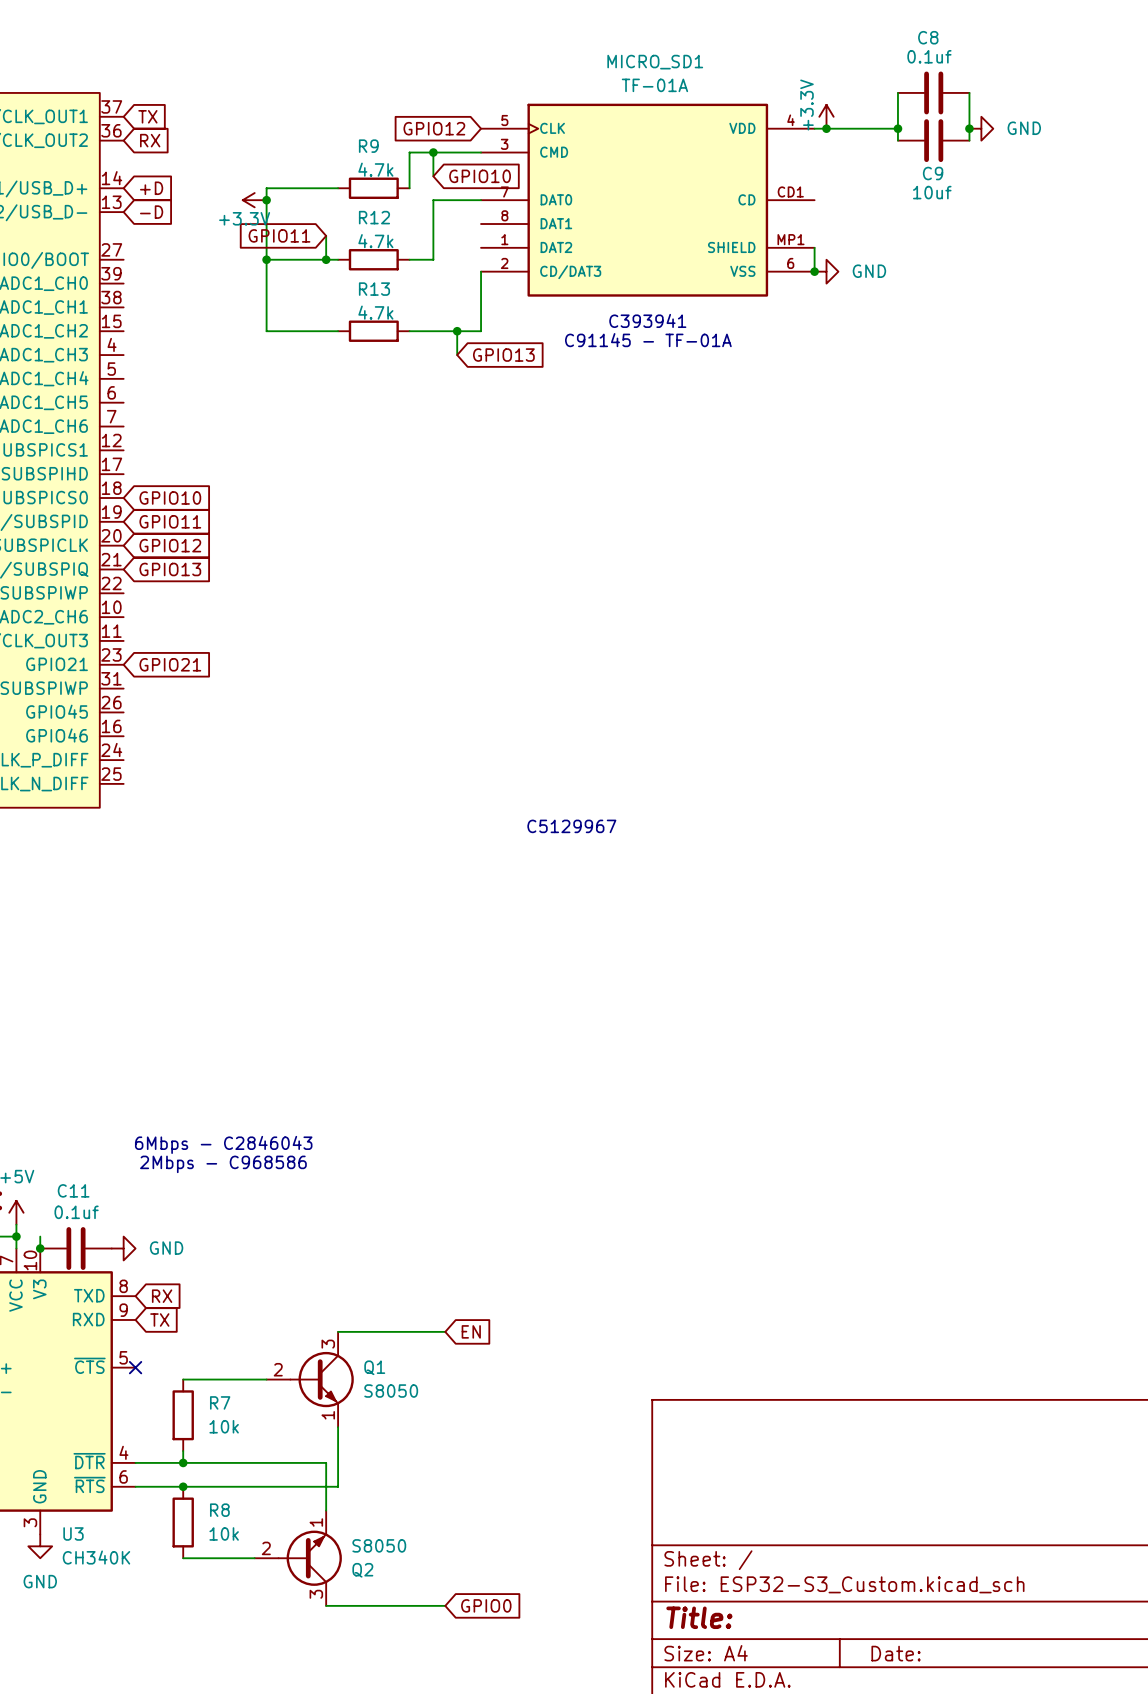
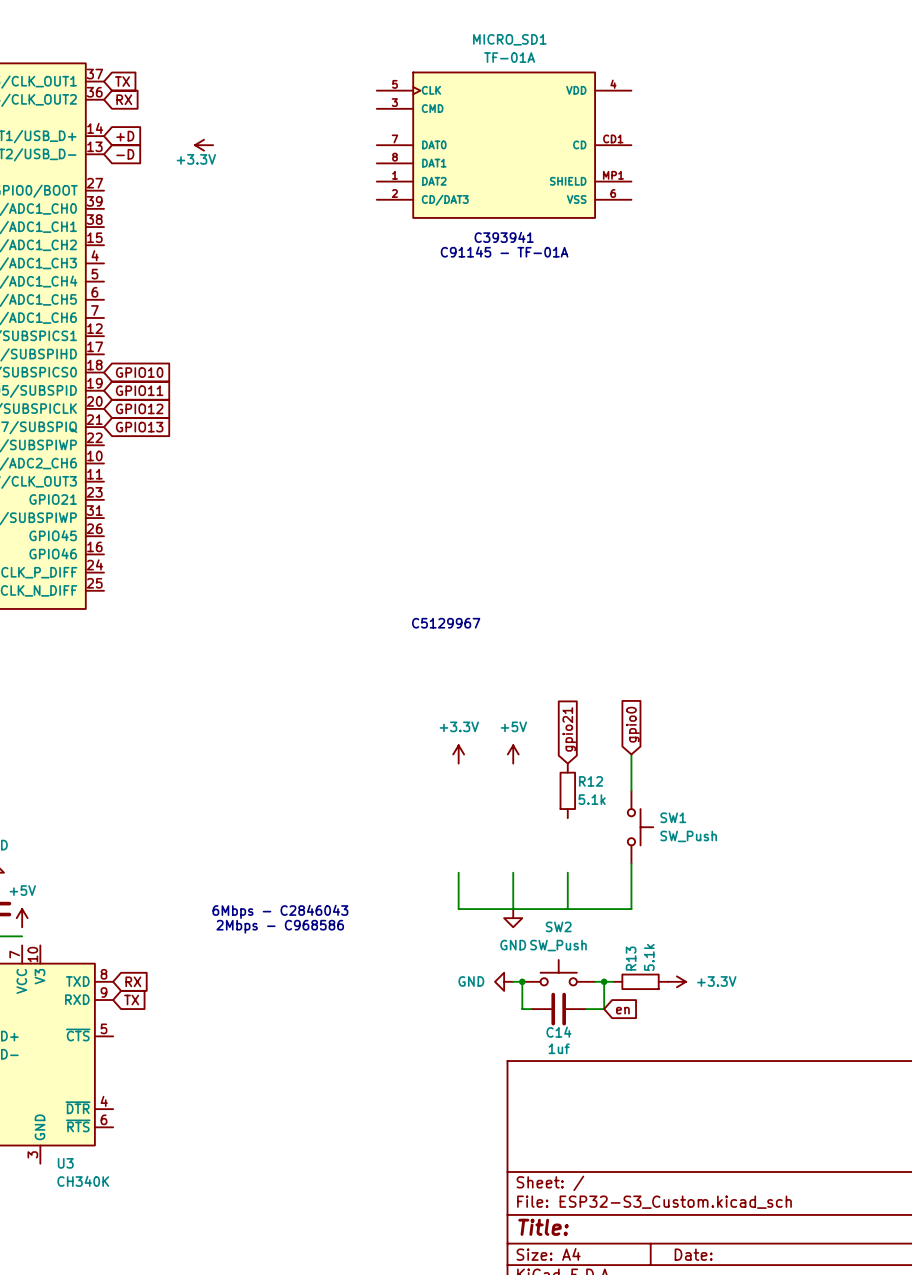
wire: (897, 92) (897, 140) -> none
C8: 0.1uf (933, 92) -> none
wire: (969, 92) (969, 140) -> none
power symbol: +3.3V (826, 116) -> none
global label: GPIO12 (434, 128) -> none
wire: (814, 128) (897, 128) -> none
junction: (826, 128) -> none
junction: (897, 128) -> none
junction: (969, 128) -> none
power symbol: GND (981, 128) -> none
C9: 10uf (933, 140) -> none
wire: (433, 152) (433, 176) -> none
junction: (433, 152) -> none
wire: (481, 152) (409, 152) (409, 188) -> none
global label: GPIO10 (480, 176) -> none
wire: (338, 188) (266, 188) (266, 331) (338, 331) -> none
R9: 4.7k (373, 188) -> none
junction: (266, 200) -> none
wire: (481, 200) (433, 200) (433, 259) (409, 259) -> none
global label: GPIO11 (279, 235) -> none
wire: (326, 235) (326, 259) -> none
R12 value: 4.7k (375, 241) -> 5.1k (592, 799)
wire: (814, 247) (814, 271) -> none
wire: (266, 259) (338, 259) -> none
junction: (266, 259) -> none
junction: (326, 259) -> none
R12 rotation: 0° (373, 259) -> 90° clockwise (567, 790)
R12 position: (373, 259) -> (567, 790)
wire: (481, 271) (481, 331) (409, 331) -> none
junction: (814, 271) -> none
power symbol: GND (826, 271) -> none
R13 name rotation: 0° (374, 289) -> 90° counterclockwise (631, 958)
R13 value: 4.7k (375, 312) -> 5.1k (649, 957)
R13 position: (373, 331) -> (640, 981)
wire: (457, 331) (457, 355) -> none
junction: (457, 331) -> none
global label: GPIO13 (503, 355) -> none
global label: GPIO21 (170, 664) -> none
global label: none -> gpio0 (632, 724)
global label: none -> gpio21 (569, 729)
power symbol: none -> +3.3V (458, 754)
power symbol: none -> +5V (513, 754)
wire: none -> (631, 754) (631, 790)
SW1: none -> SW_Push (640, 827)
wire: none -> (631, 863) (631, 909) (458, 909) (458, 872)
text position: 6Mbps - C2846043 (223, 1144) -> 6Mbps - C2846043 (280, 911)
wire: none -> (513, 872) (513, 909)
wire: none -> (567, 872) (567, 909)
text position: 2Mbps - C968586 (223, 1164) -> 2Mbps - C968586 (280, 926)
power symbol: none -> GND (513, 918)
wire: (16, 1224) (16, 1248) -> none
junction: (16, 1236) -> none
wire: (40, 1236) (40, 1248) -> none
junction: (40, 1248) -> none
C11: 0.1uf (75, 1248) -> none
power symbol: GND (123, 1248) -> none
SW2: none -> SW_Push (558, 972)
power symbol: none -> GND (504, 981)
wire: none -> (513, 981) (522, 981) (522, 1009) (531, 1009)
junction: none -> (522, 981)
wire: none -> (595, 981) (613, 981)
wire: none -> (604, 981) (604, 1009) (585, 1009)
junction: none -> (604, 981)
power symbol: none -> +3.3V (676, 981)
wire: (338, 1331) (445, 1331) -> none
global label: EN (471, 1331) -> none
C14: none -> 1uf (558, 1009)
global label: none -> en (622, 1010)
no-connect mark: (135, 1367) -> none
wire: (183, 1379) (266, 1379) -> none
Q1: S8050 (310, 1379) -> none
R7: 10k (183, 1415) -> none
wire: (338, 1427) (338, 1486) (135, 1486) -> none
wire: (183, 1451) (183, 1462) -> none
wire: (135, 1462) (326, 1462) (326, 1510) -> none
junction: (183, 1462) -> none
junction: (183, 1486) -> none
R8: 10k (183, 1522) -> none
power symbol: GND (40, 1546) -> none
wire: (183, 1558) (254, 1558) -> none
Q2: S8050 (298, 1558) -> none
wire: (326, 1605) (445, 1605) -> none
global label: GPIO0 (486, 1605) -> none

